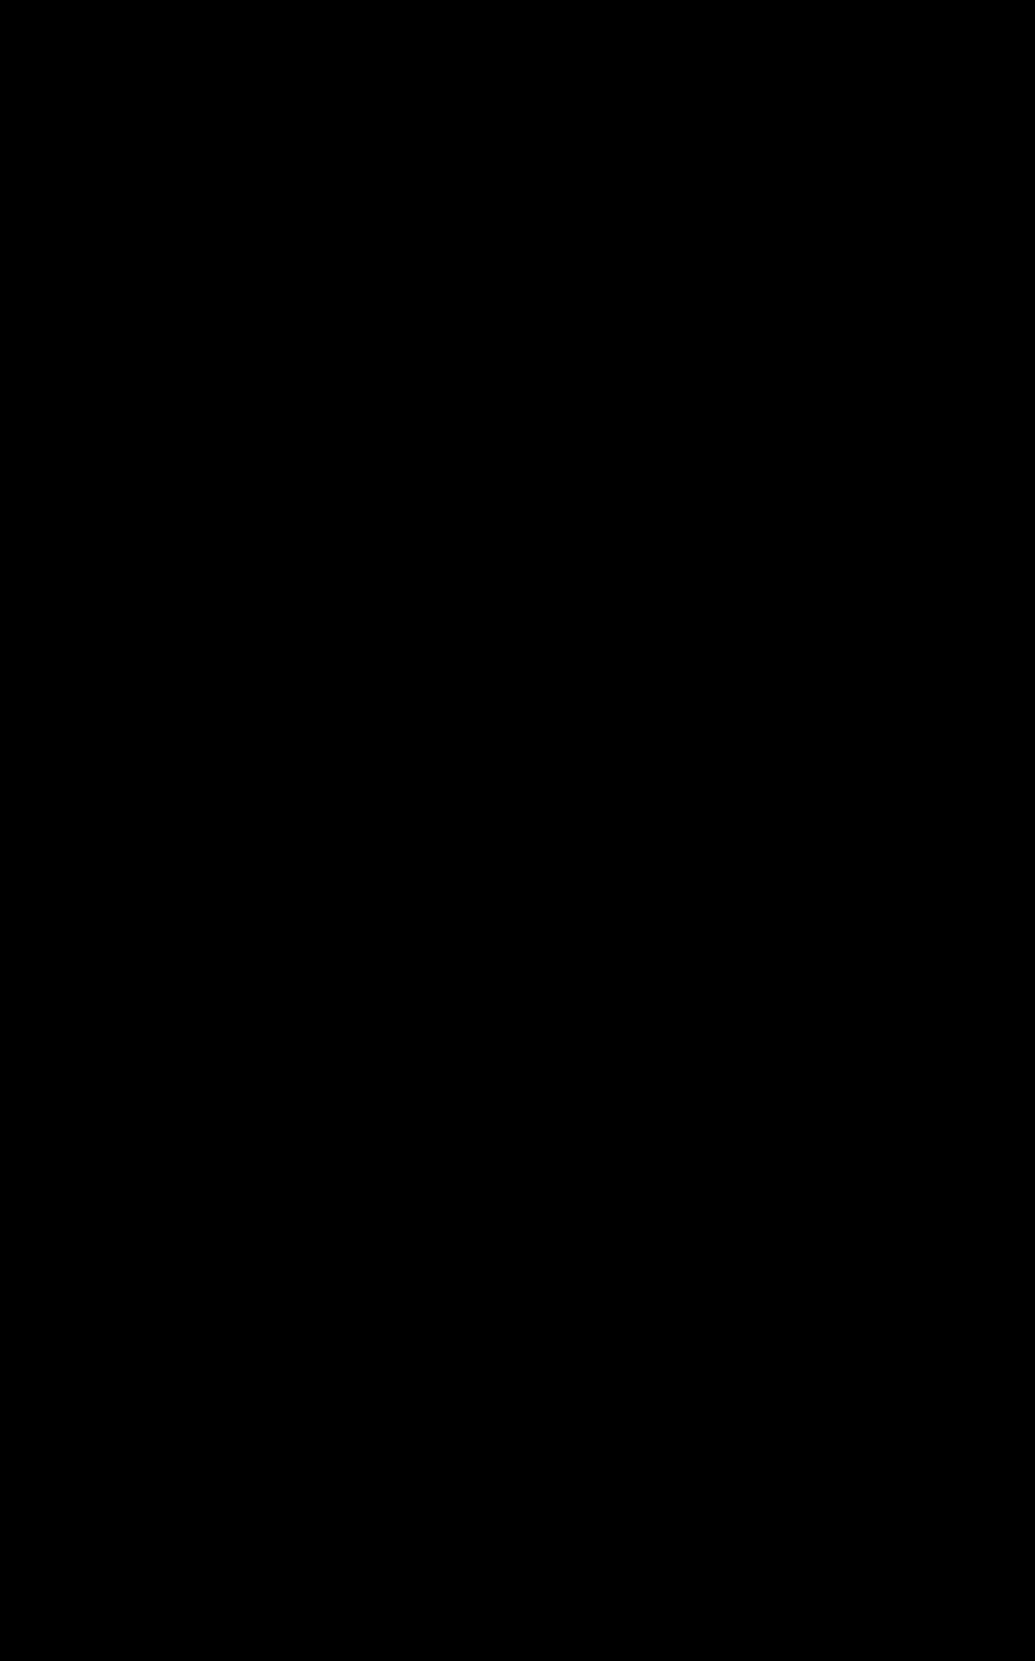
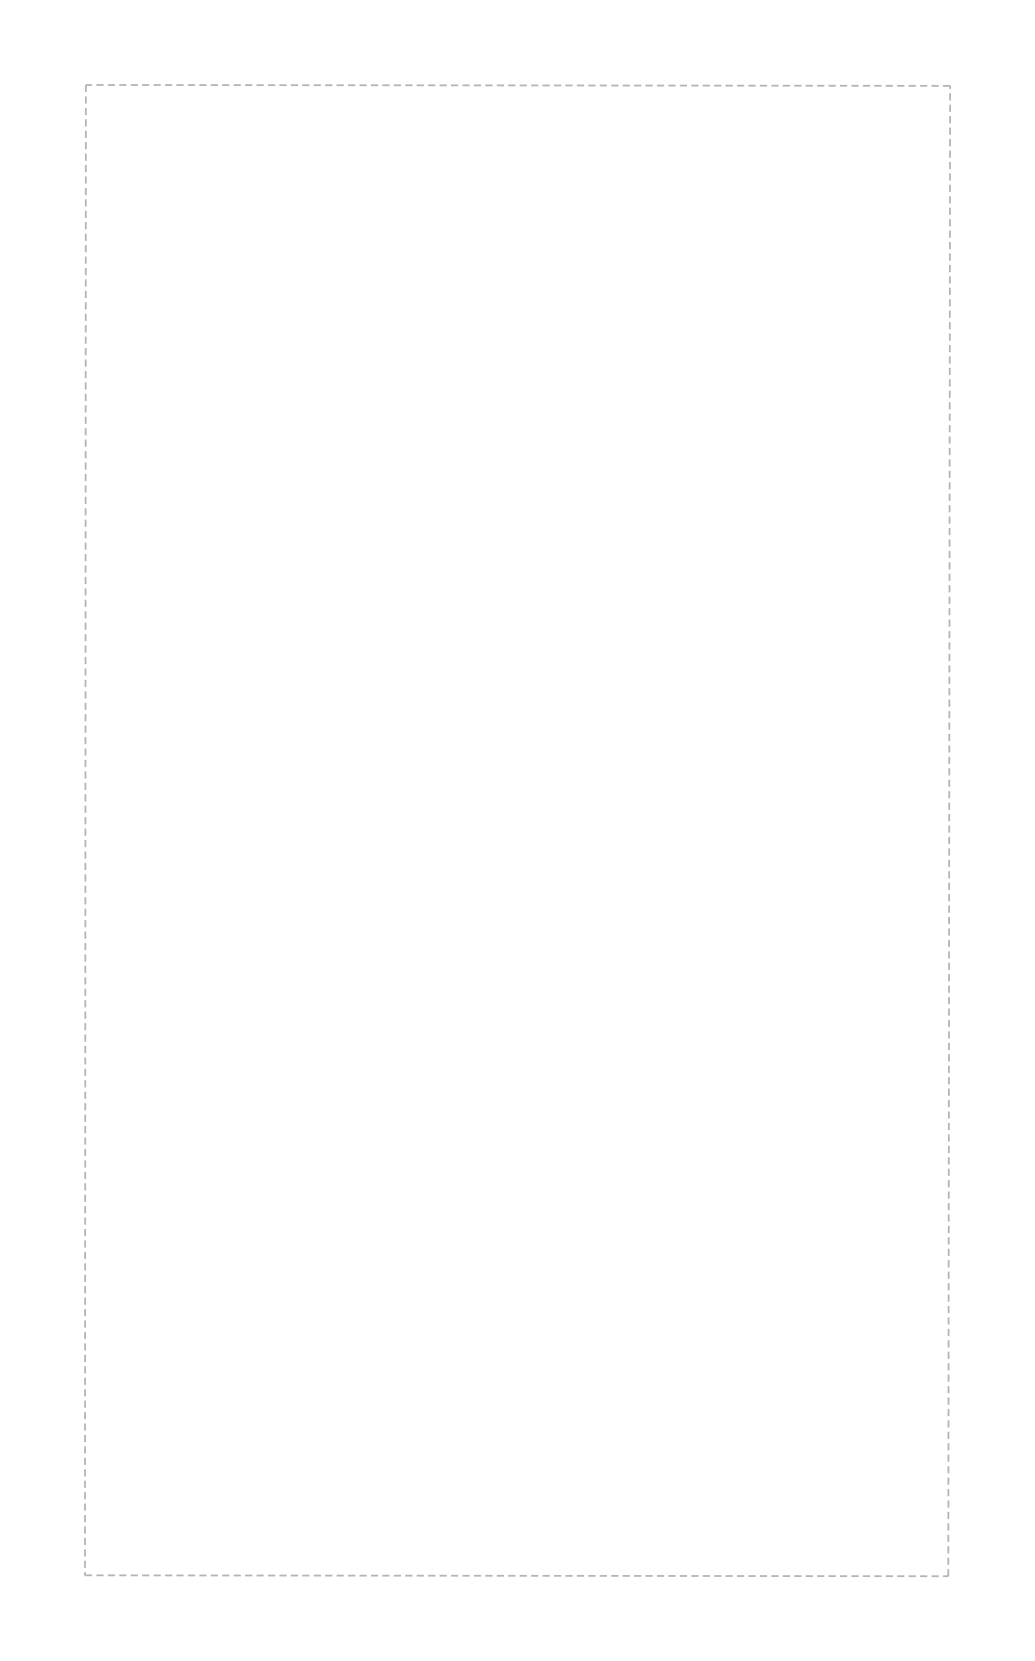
zone outline: none -> (85, 84) (950, 85) (948, 1576) (84, 1575) (85, 84)

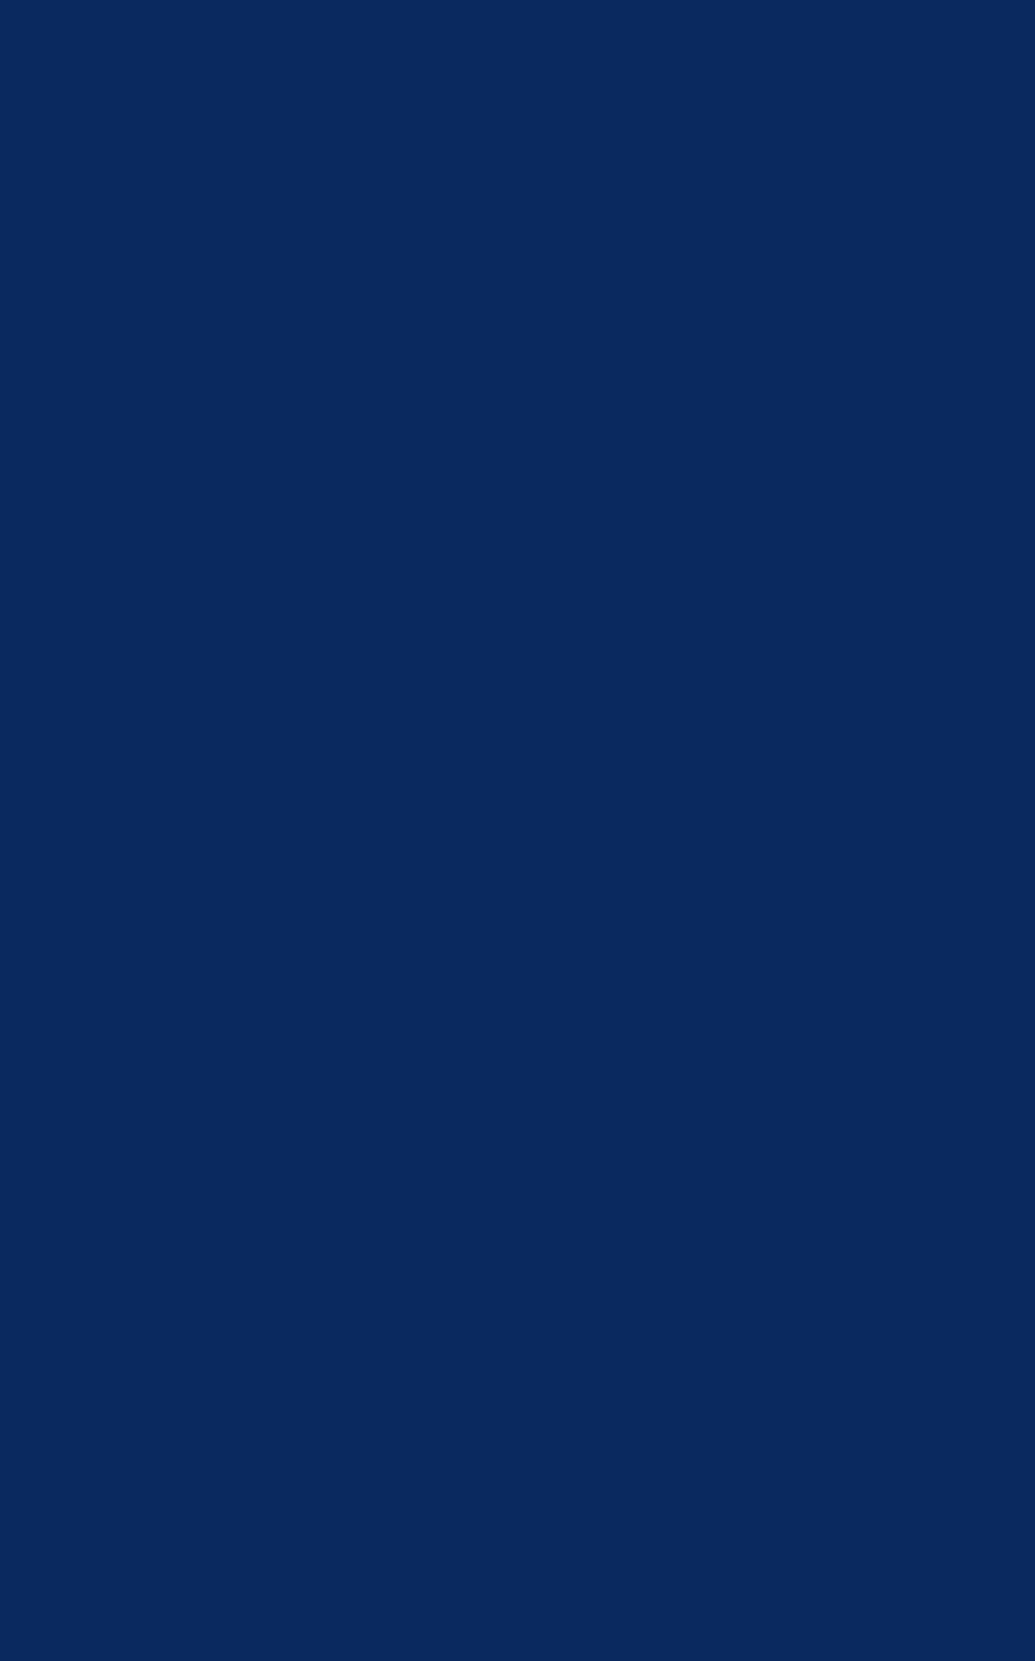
zone outline: (85, 84) (950, 85) (948, 1576) (84, 1575) (85, 84) -> none

